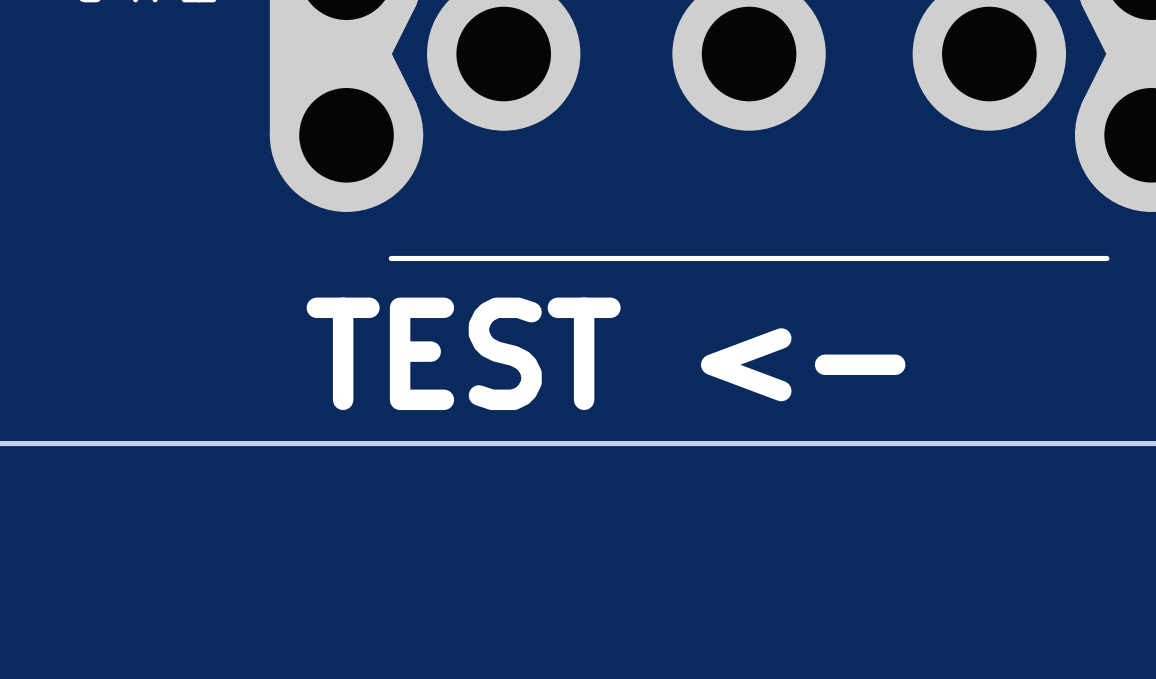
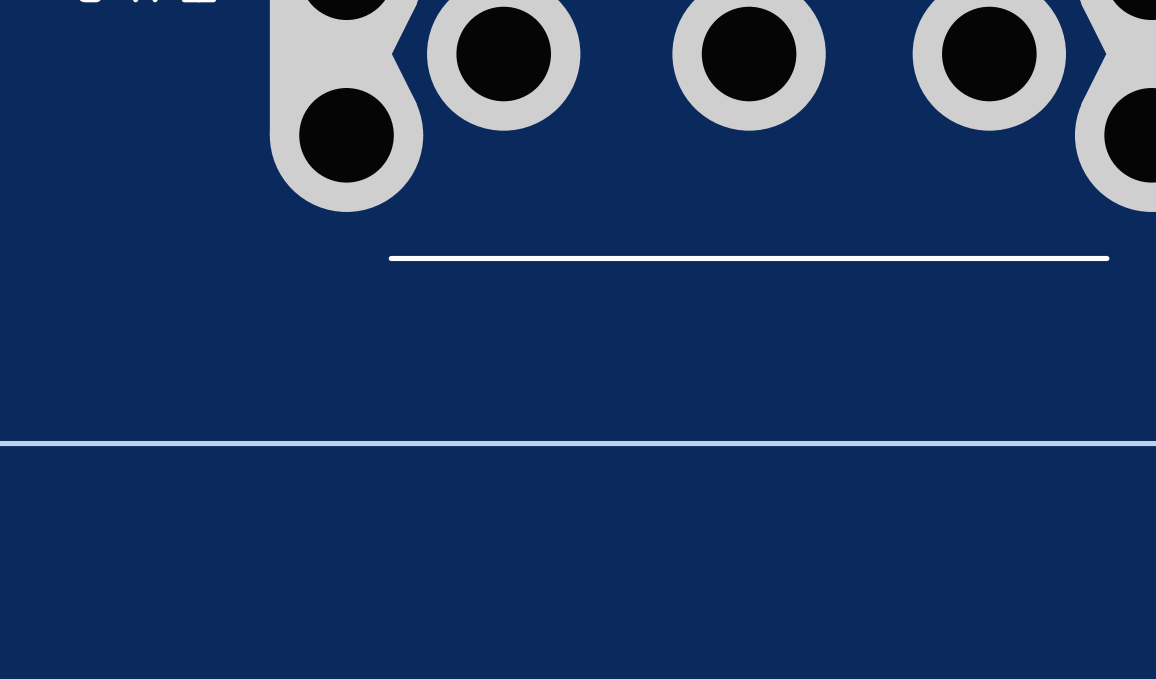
text: TEST <- (606, 353) -> none

